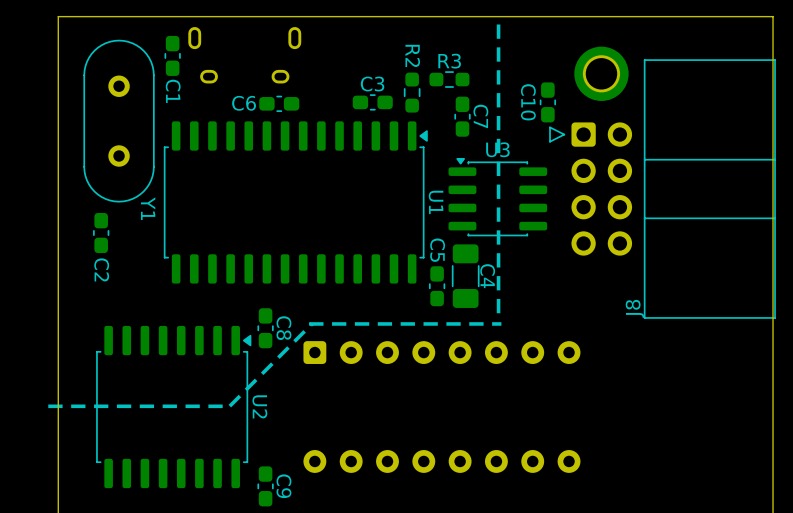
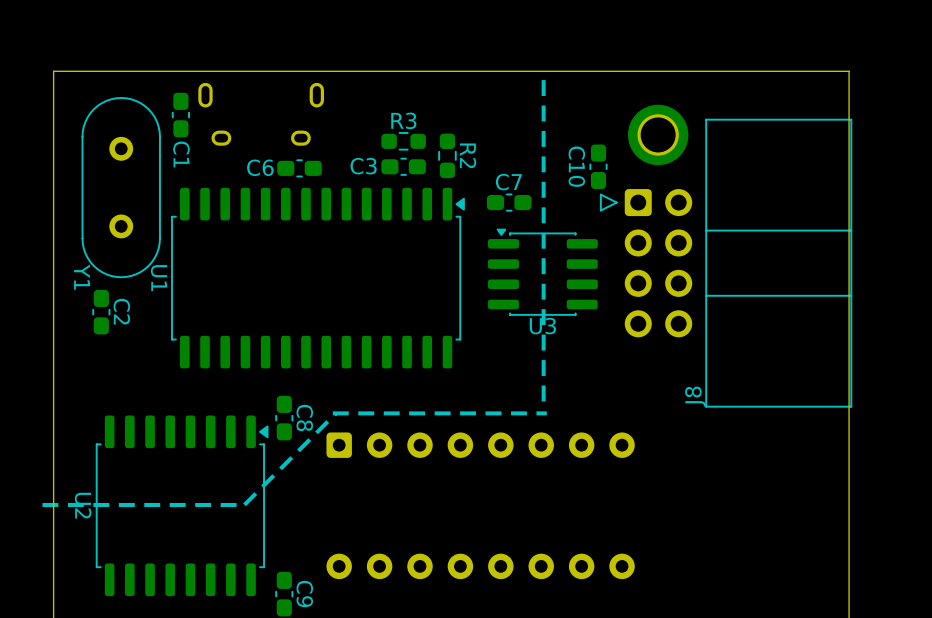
R2 name position: R2 (412, 55) -> R2 (468, 155)
R3 position: (449, 79) -> (403, 141)
C3 name position: C3 (372, 84) -> C3 (363, 166)
C7 rotation: 0° (462, 116) -> 90° clockwise (509, 202)
U3 name position: U3 (497, 149) -> U3 (542, 326)
U1 name position: U1 (436, 202) -> U1 (159, 278)
Y1 name position: Y1 (148, 208) -> Y1 (82, 277)
C2 name position: C2 (101, 269) -> C2 (121, 311)
C4: (465, 276) -> none
C5: (437, 286) -> none
U2 name position: U2 (259, 406) -> U2 (83, 505)

